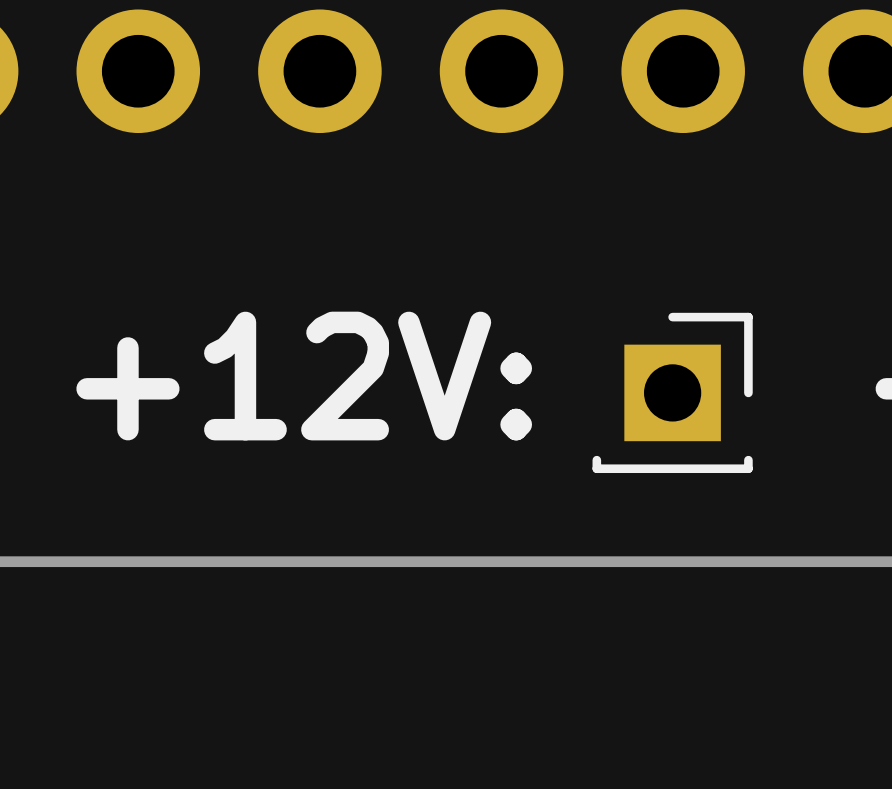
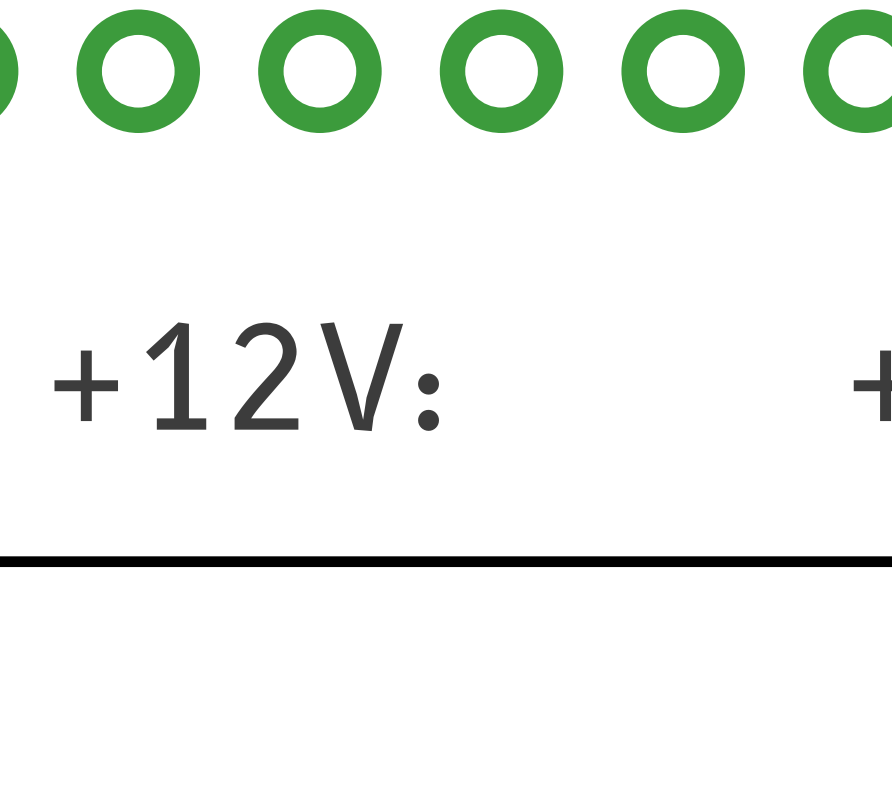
part: (672, 392) -> none

